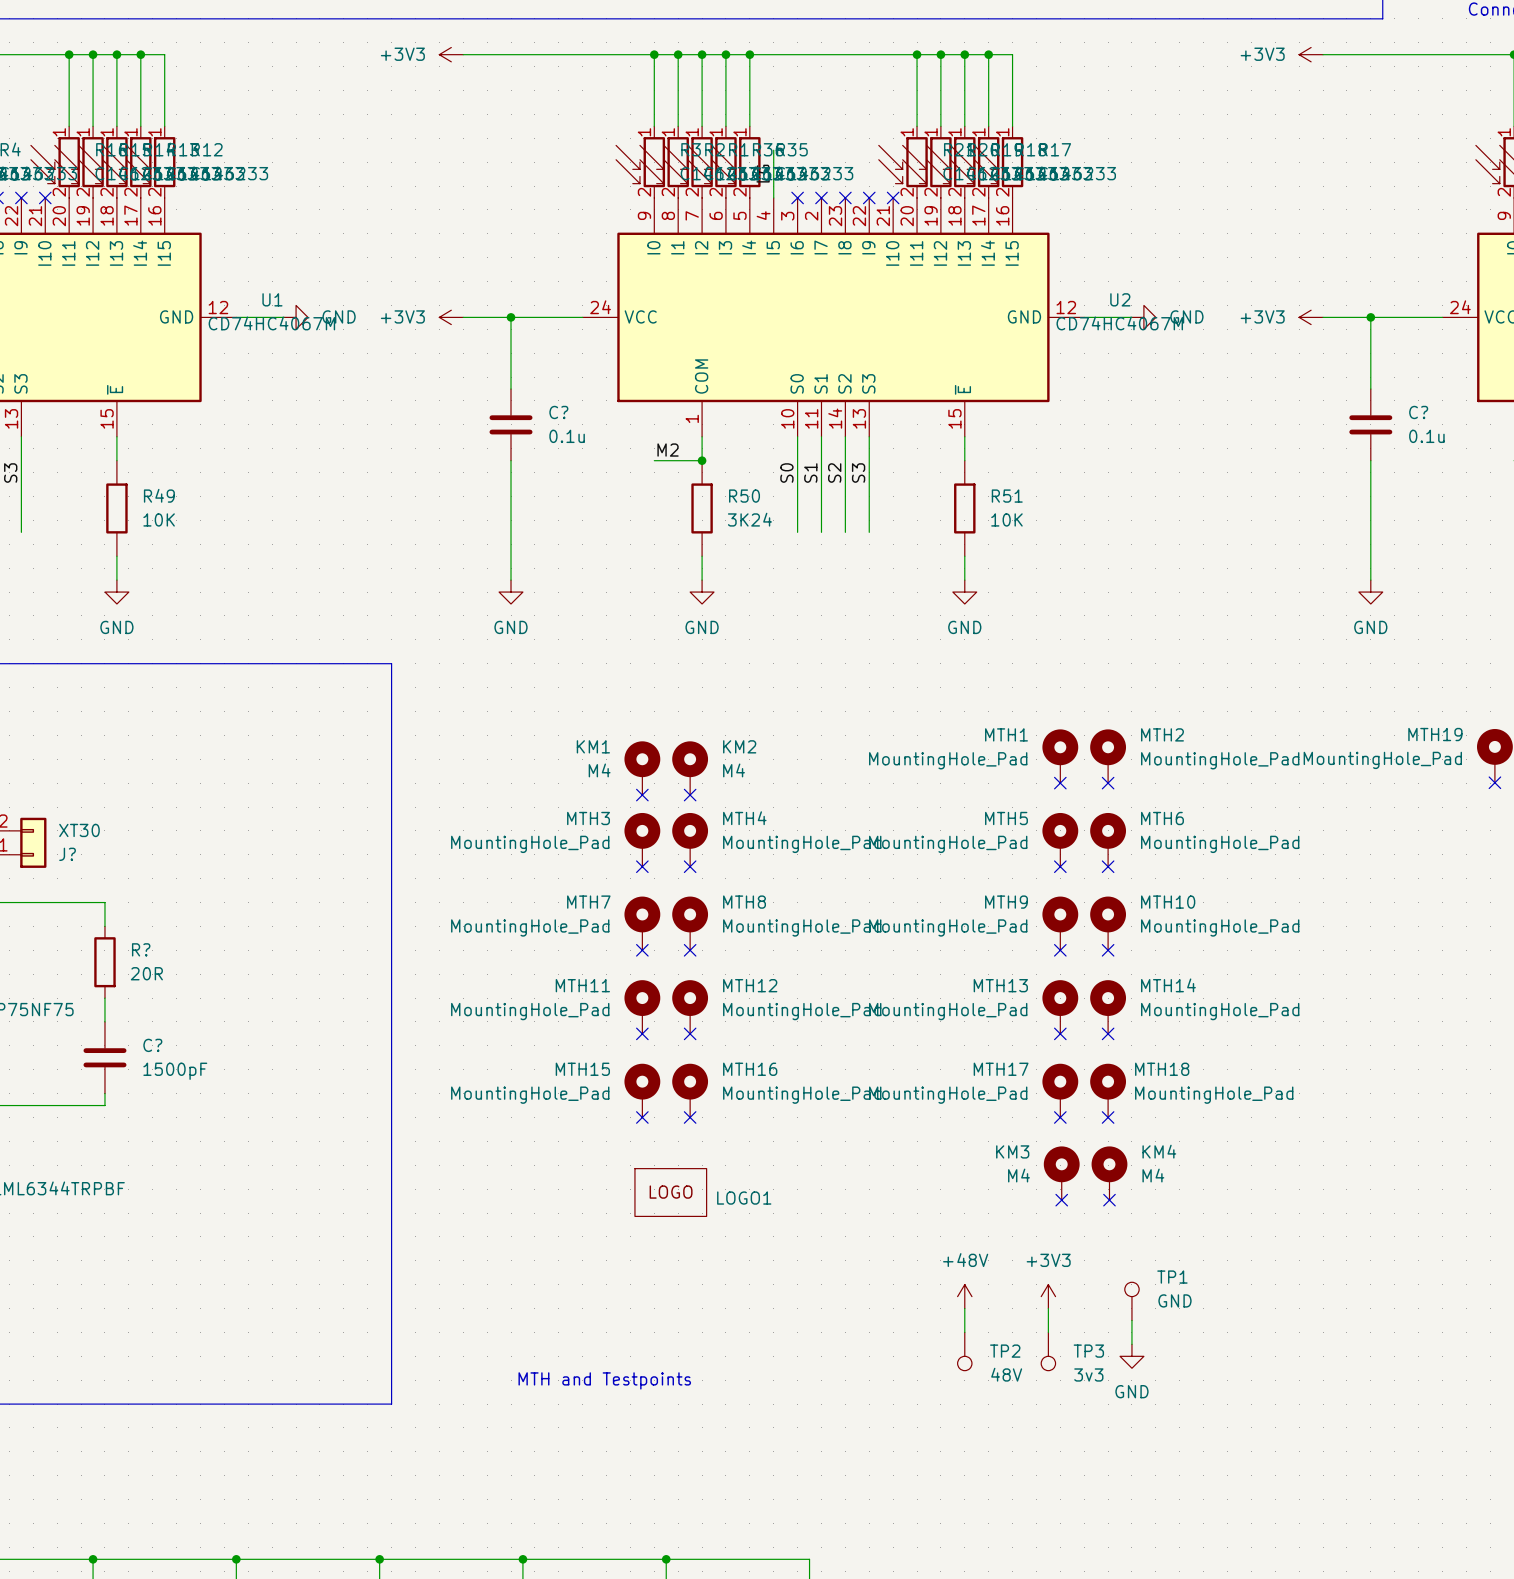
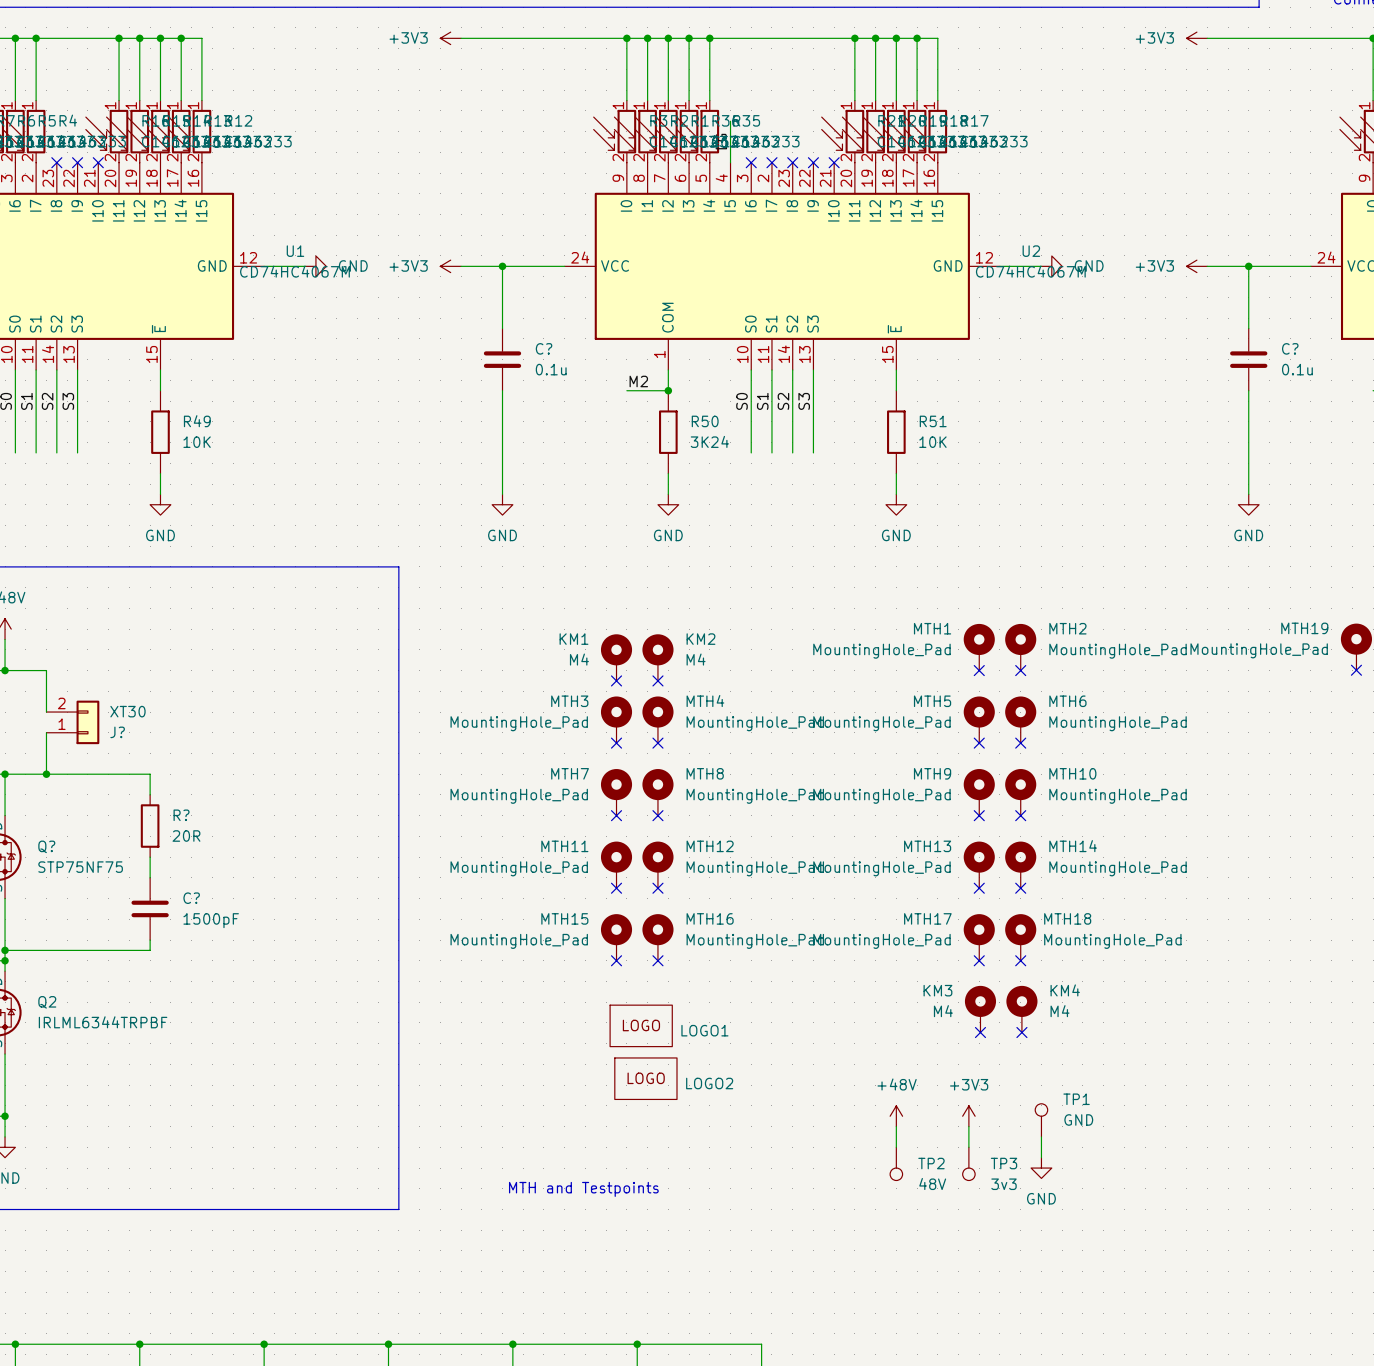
LOGO2: none -> (645, 1078)

